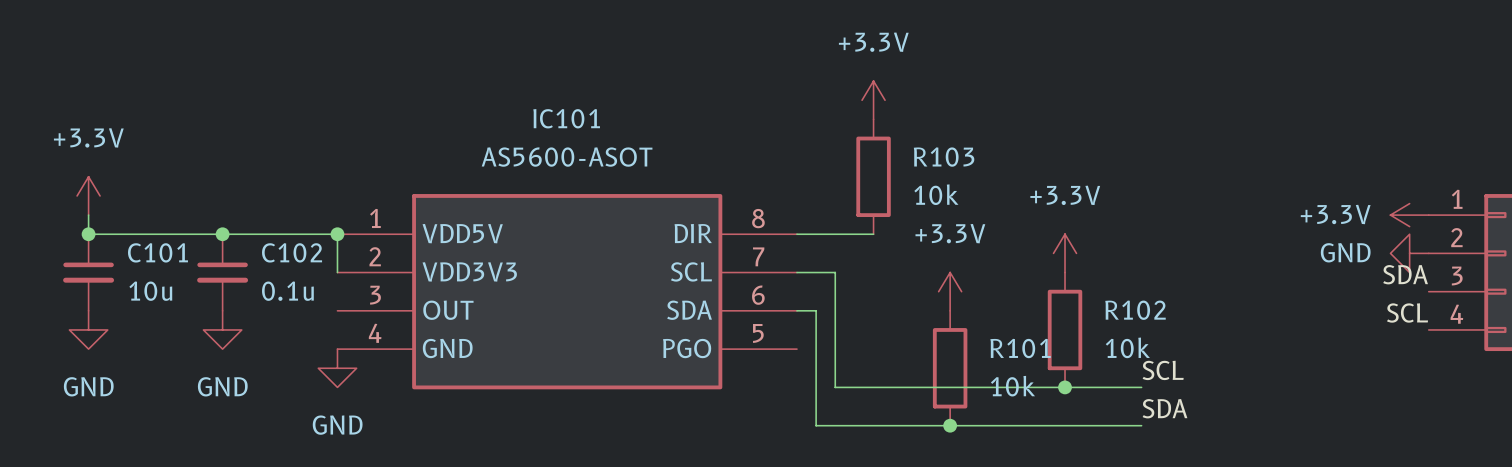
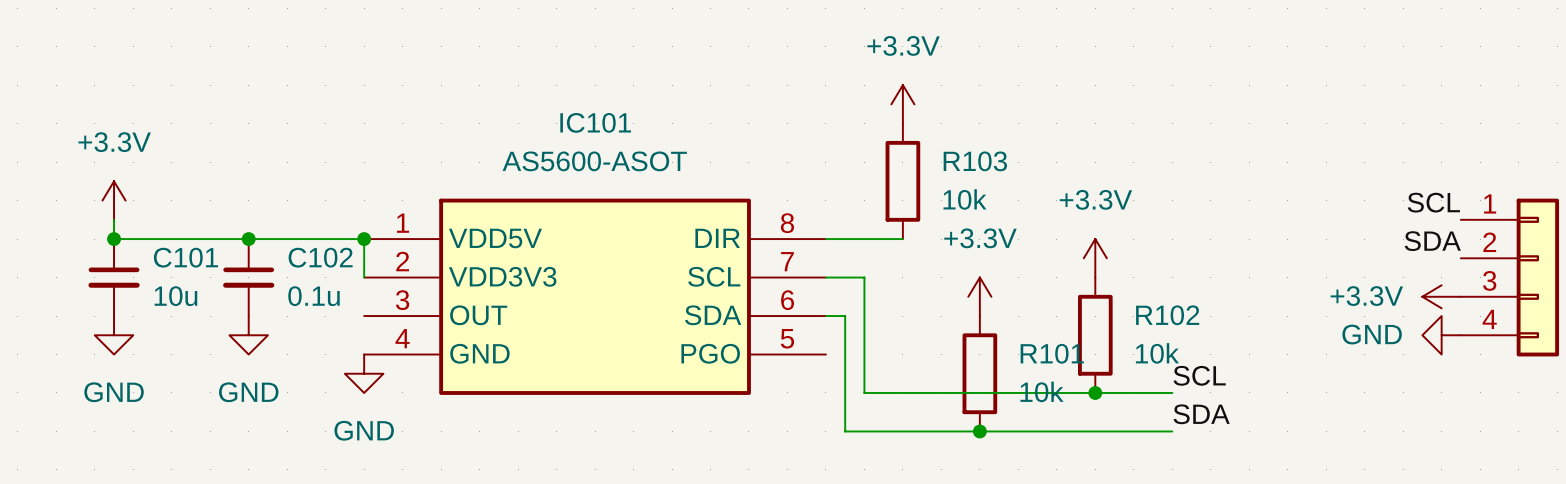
power symbol position: +3.3V (1409, 215) -> +3.3V (1441, 296)
power symbol position: GND (1409, 253) -> GND (1441, 335)
label position: SDA (1405, 274) -> SDA (1432, 241)
label position: SCL (1407, 312) -> SCL (1433, 202)

